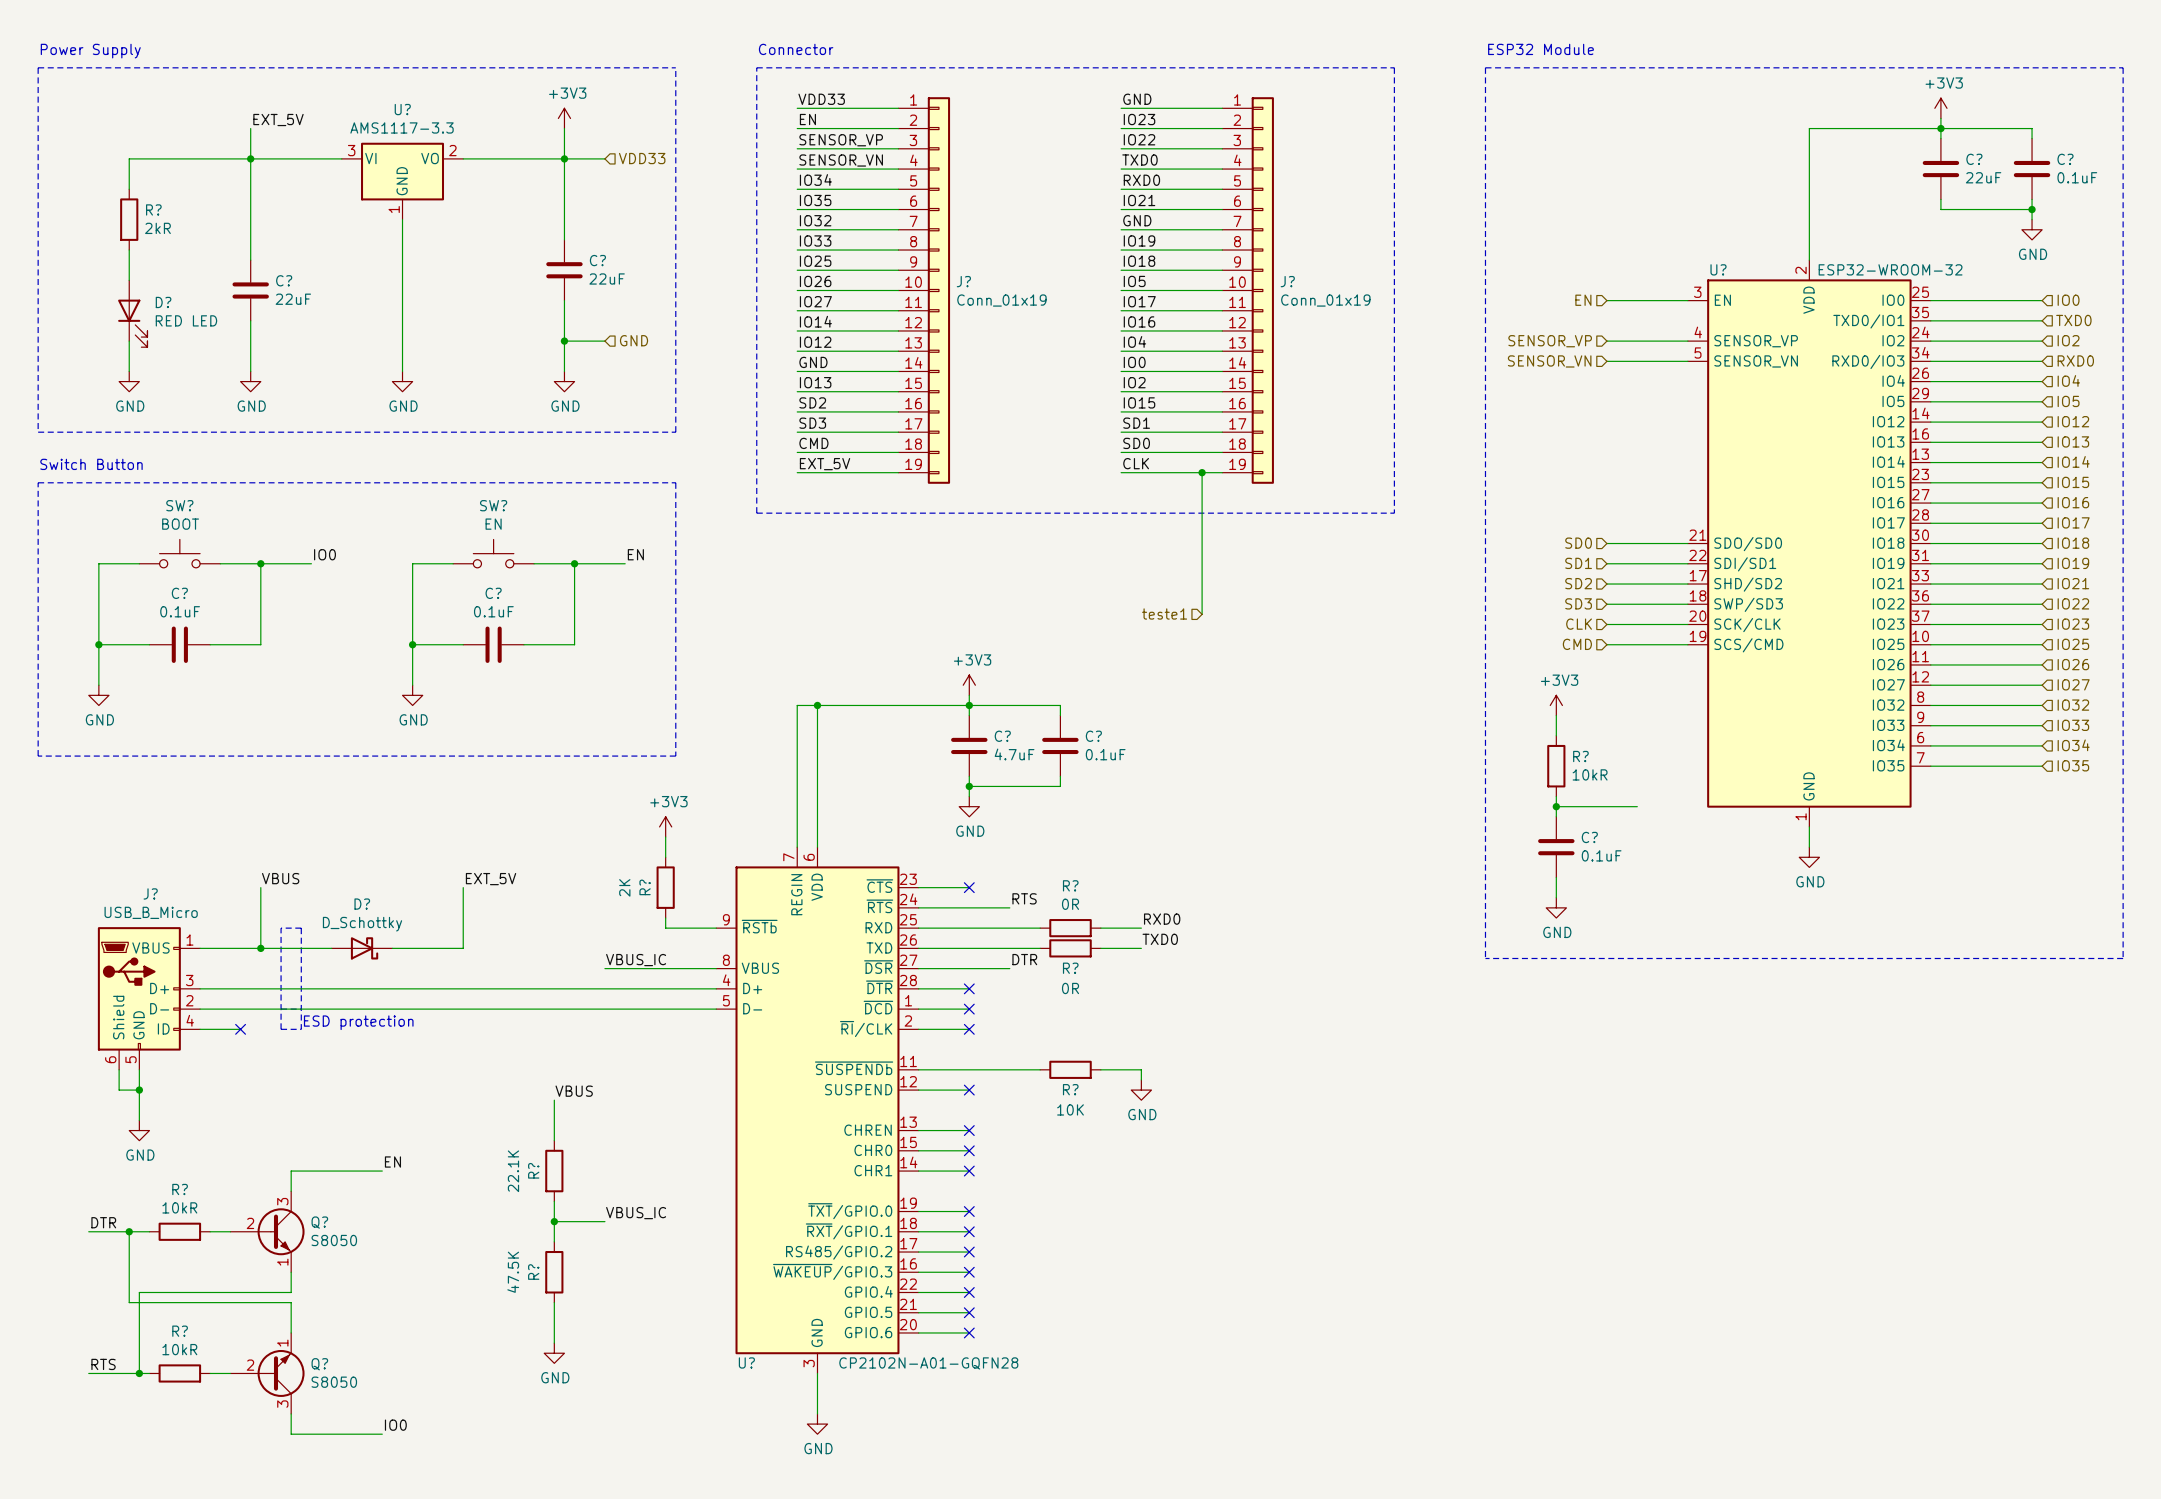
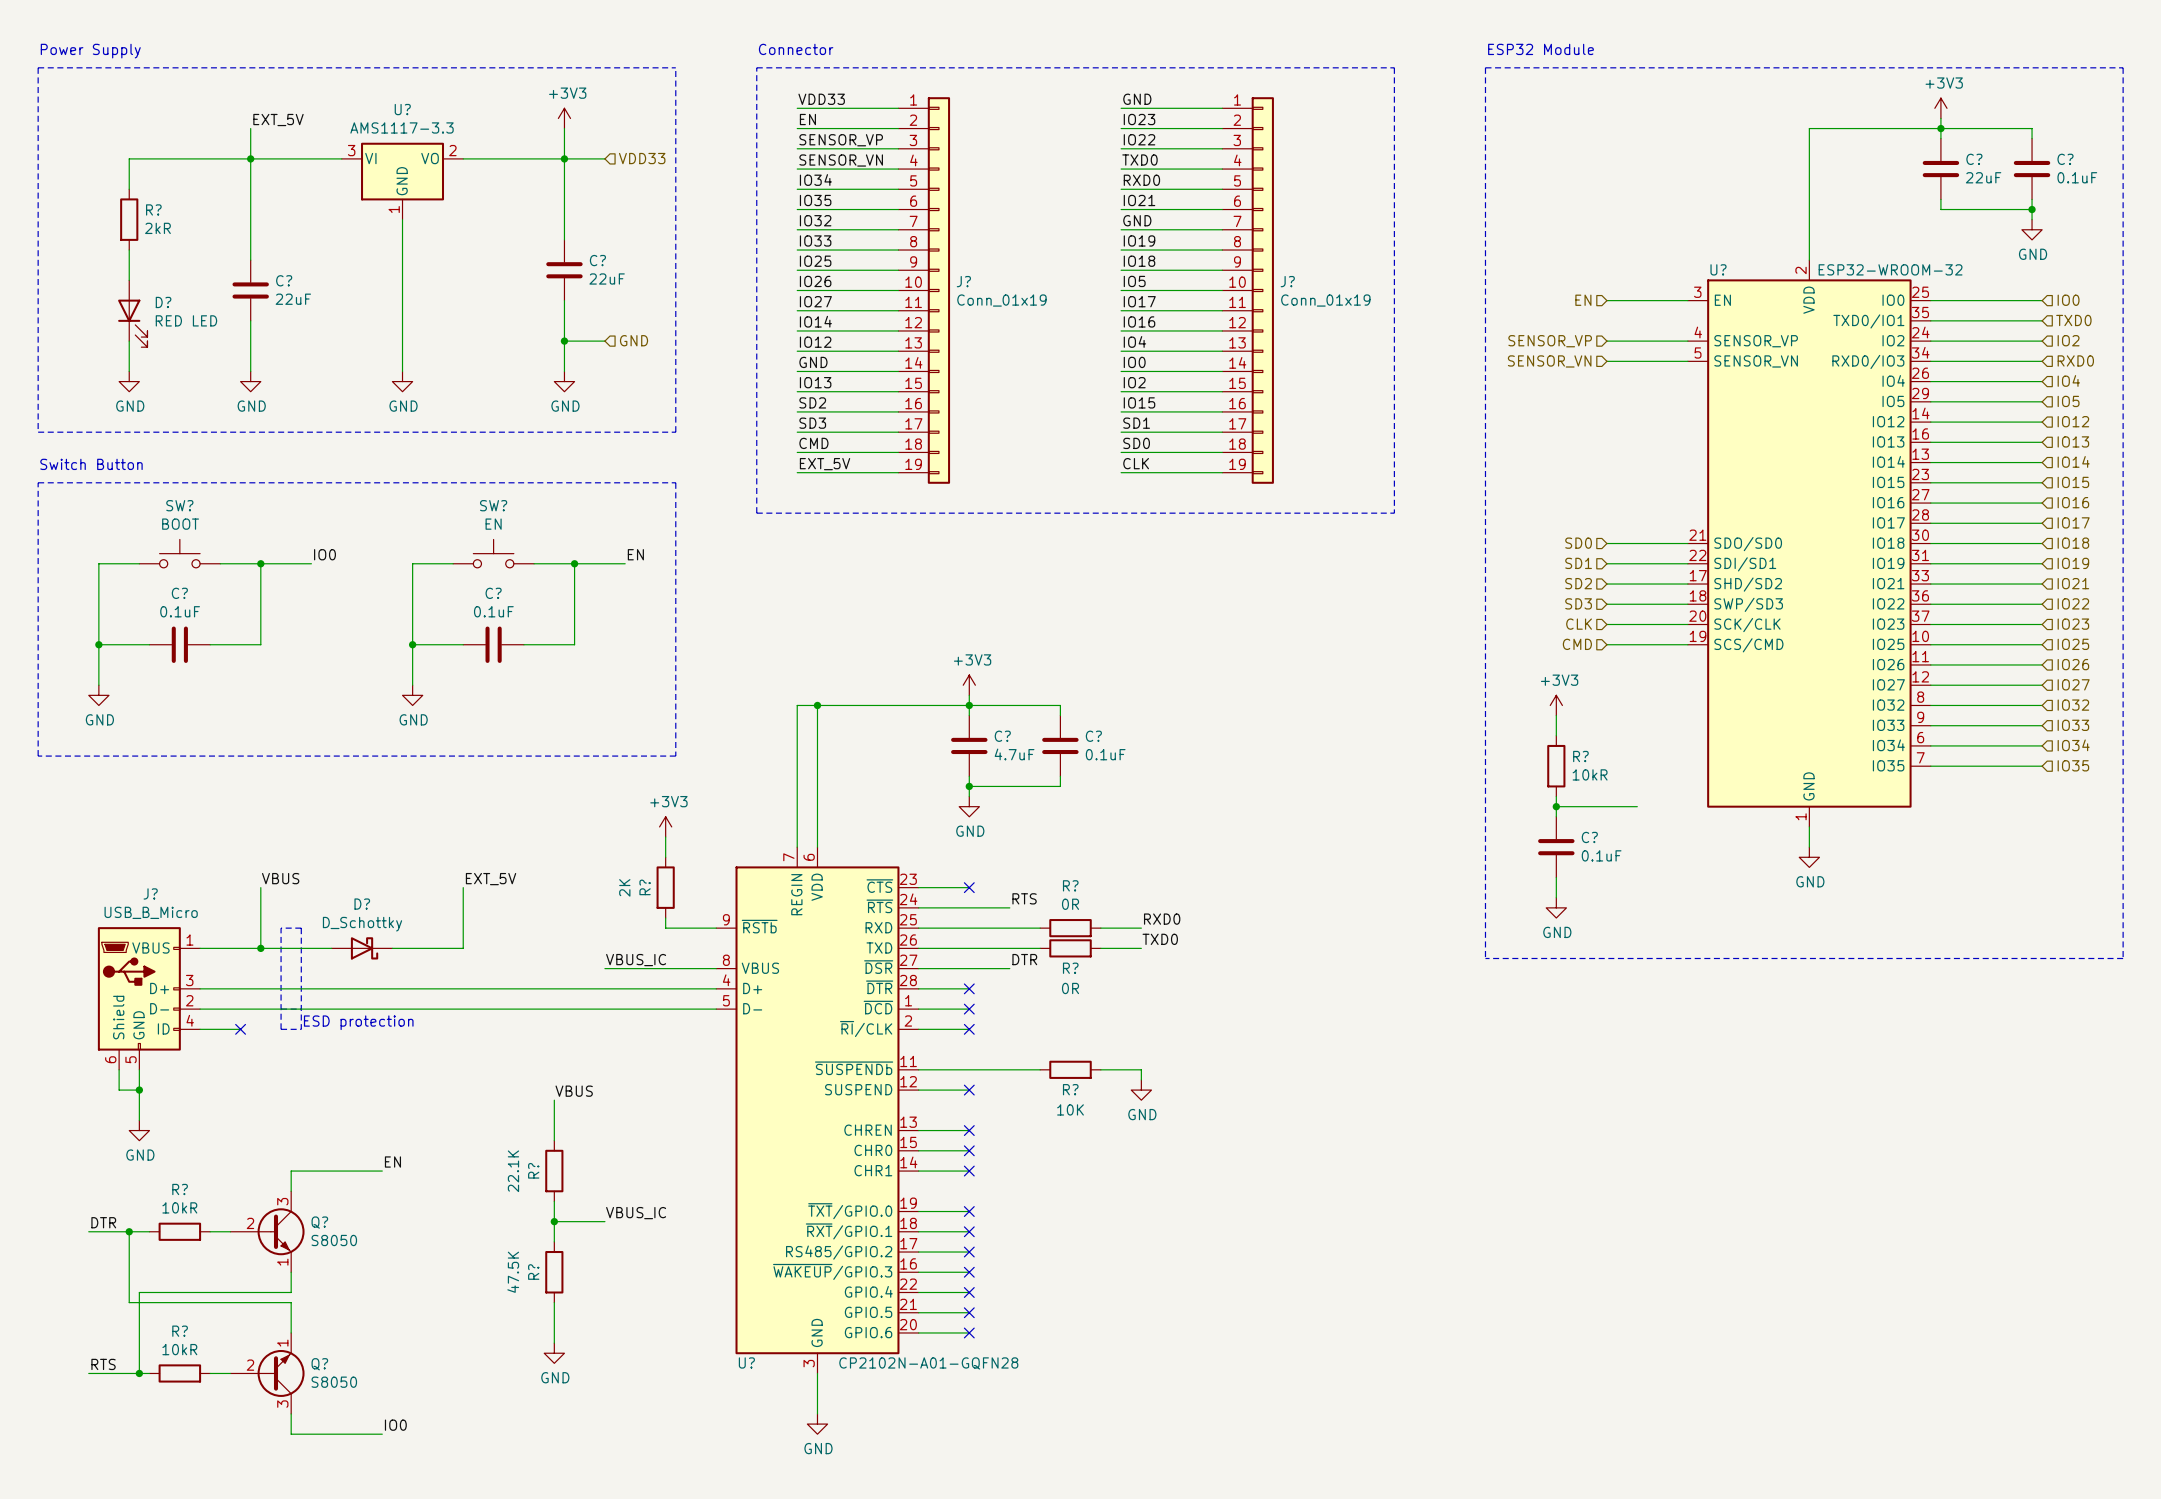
wire: (1202, 472) (1202, 614) -> none
junction: (1202, 472) -> none
hierarchical label: teste1 (1164, 613) -> none

